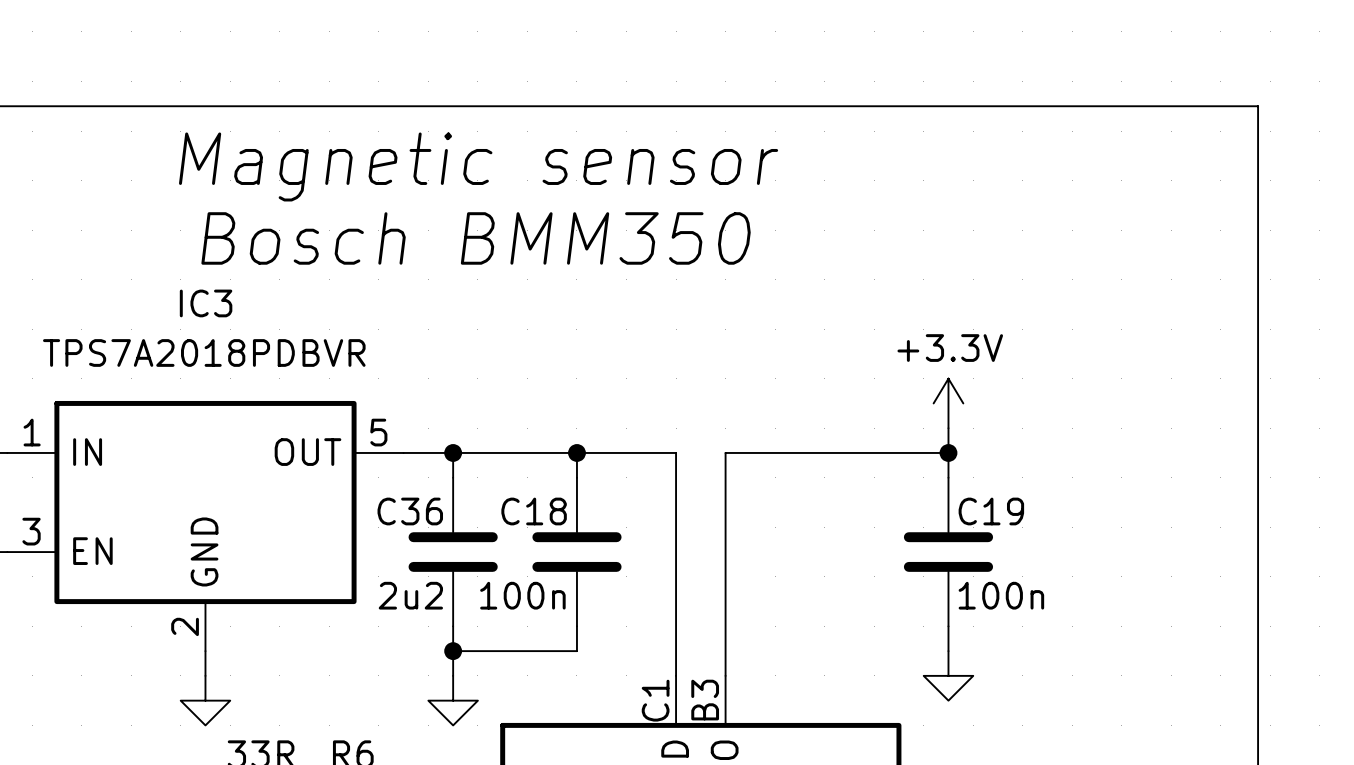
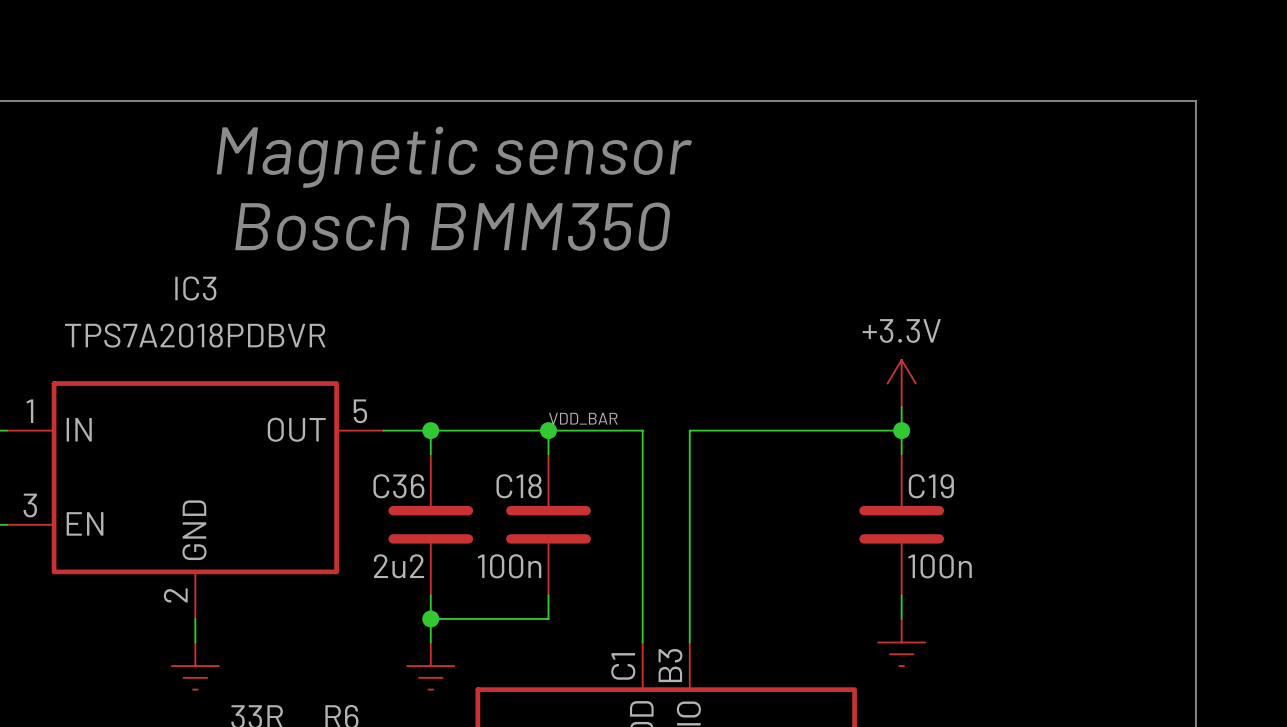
label: none -> VDD_BAR (583, 418)
power symbol shape: [923, 651, 974, 701] -> [878, 618, 926, 667]
power symbol shape: [180, 675, 231, 726] -> [171, 642, 219, 690]
power symbol shape: [428, 675, 478, 726] -> [407, 642, 455, 690]

